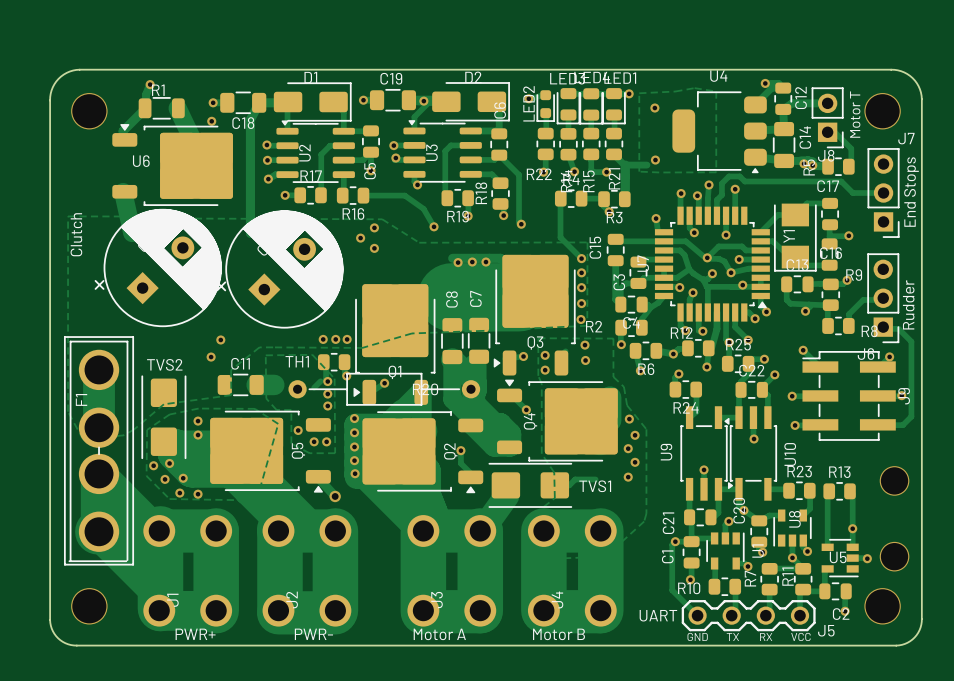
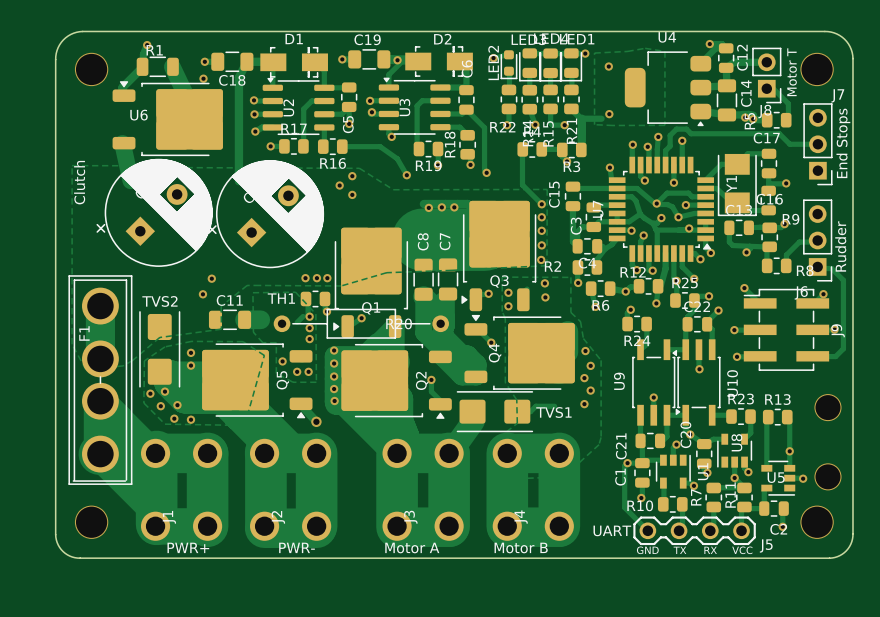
D1 footprint: [273, 82, 352, 122] -> [260, 47, 328, 78]
D2 footprint: [432, 82, 510, 122] -> [405, 46, 473, 77]

